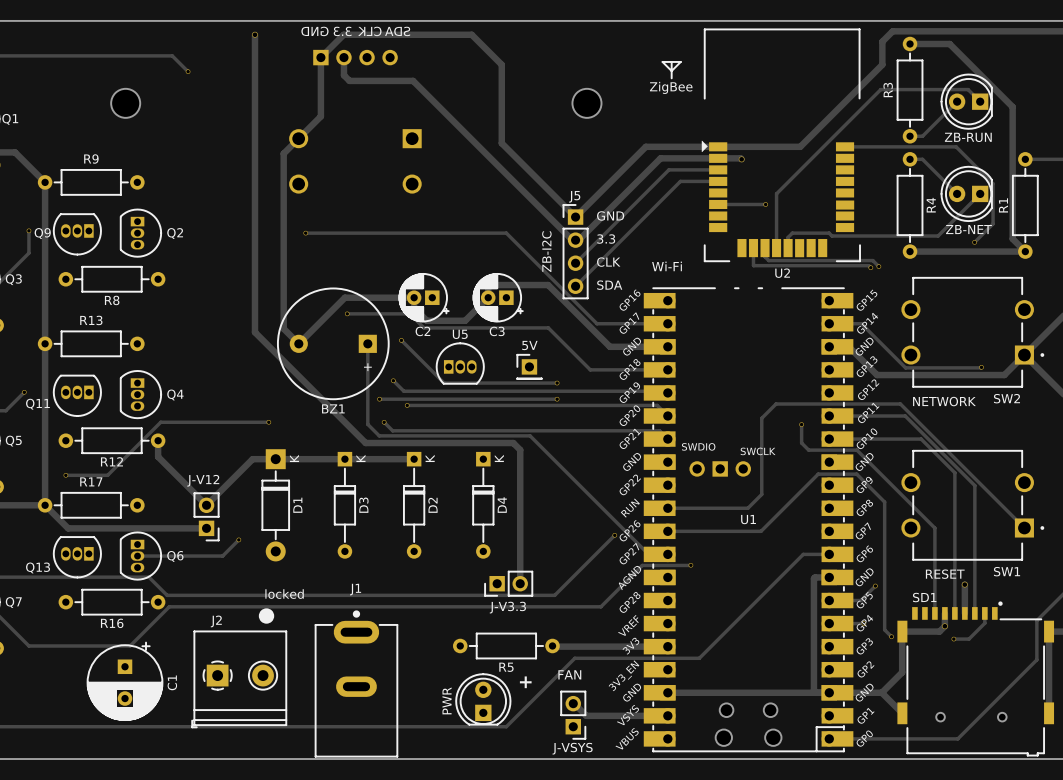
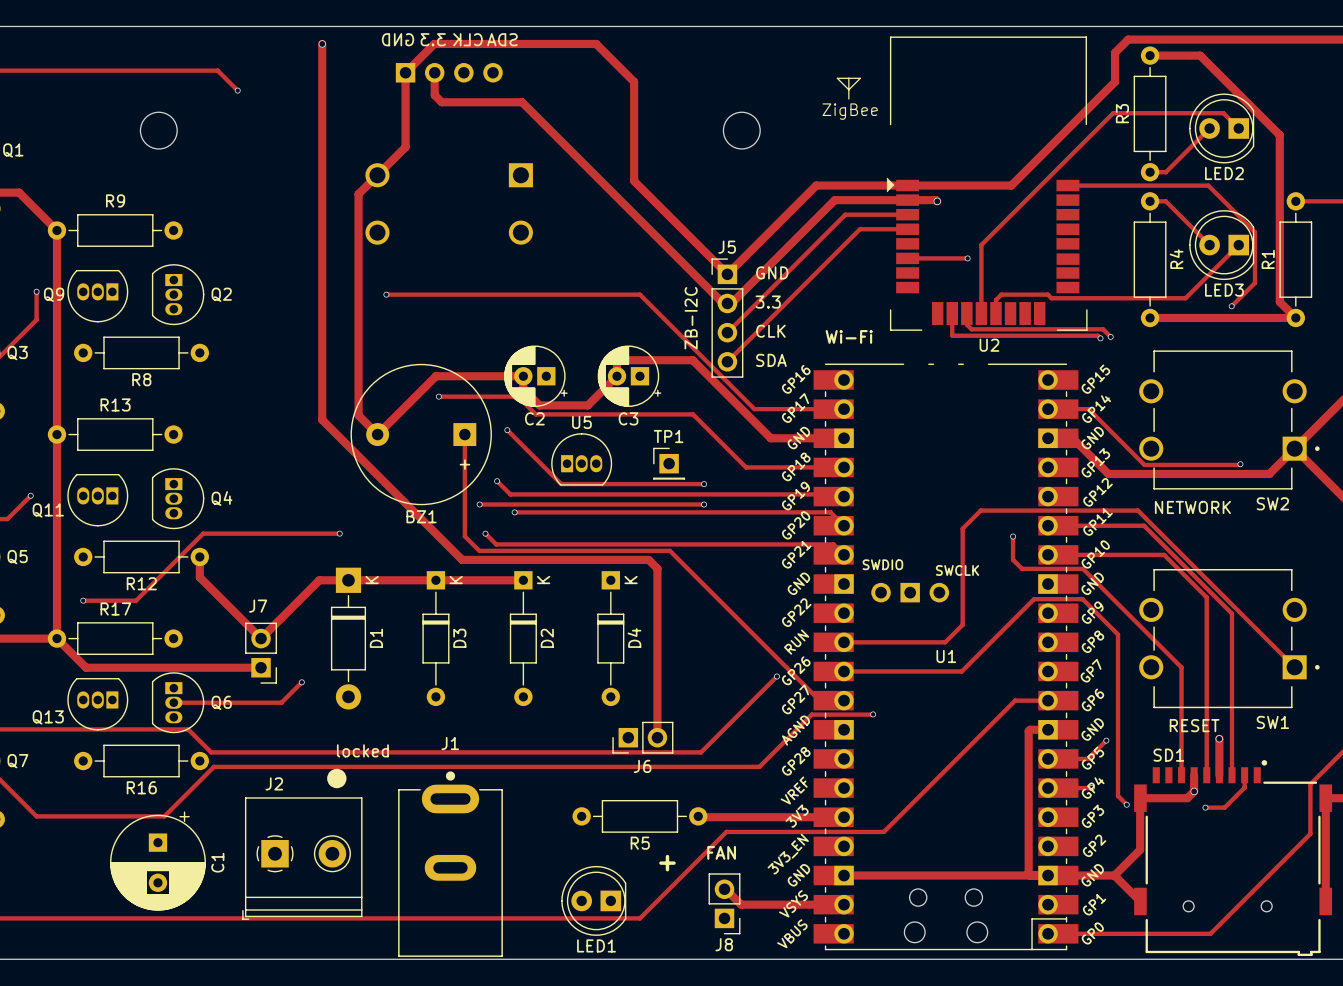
ZB-RUN name: ZB-RUN (968, 137) -> LED2 (1224, 173)
ZB-NET name: ZB-NET (968, 229) -> LED3 (1224, 290)
5V name: 5V (529, 345) -> TP1 (668, 436)
J-V12 name: J-V12 (203, 480) -> J7 (258, 606)
J-V3.3 name: J-V3.3 (507, 607) -> J6 (642, 766)
PWR: (483, 699) -> none
LED1: none -> (593, 900)
J-VSYS name: J-VSYS (572, 748) -> J8 (724, 944)

